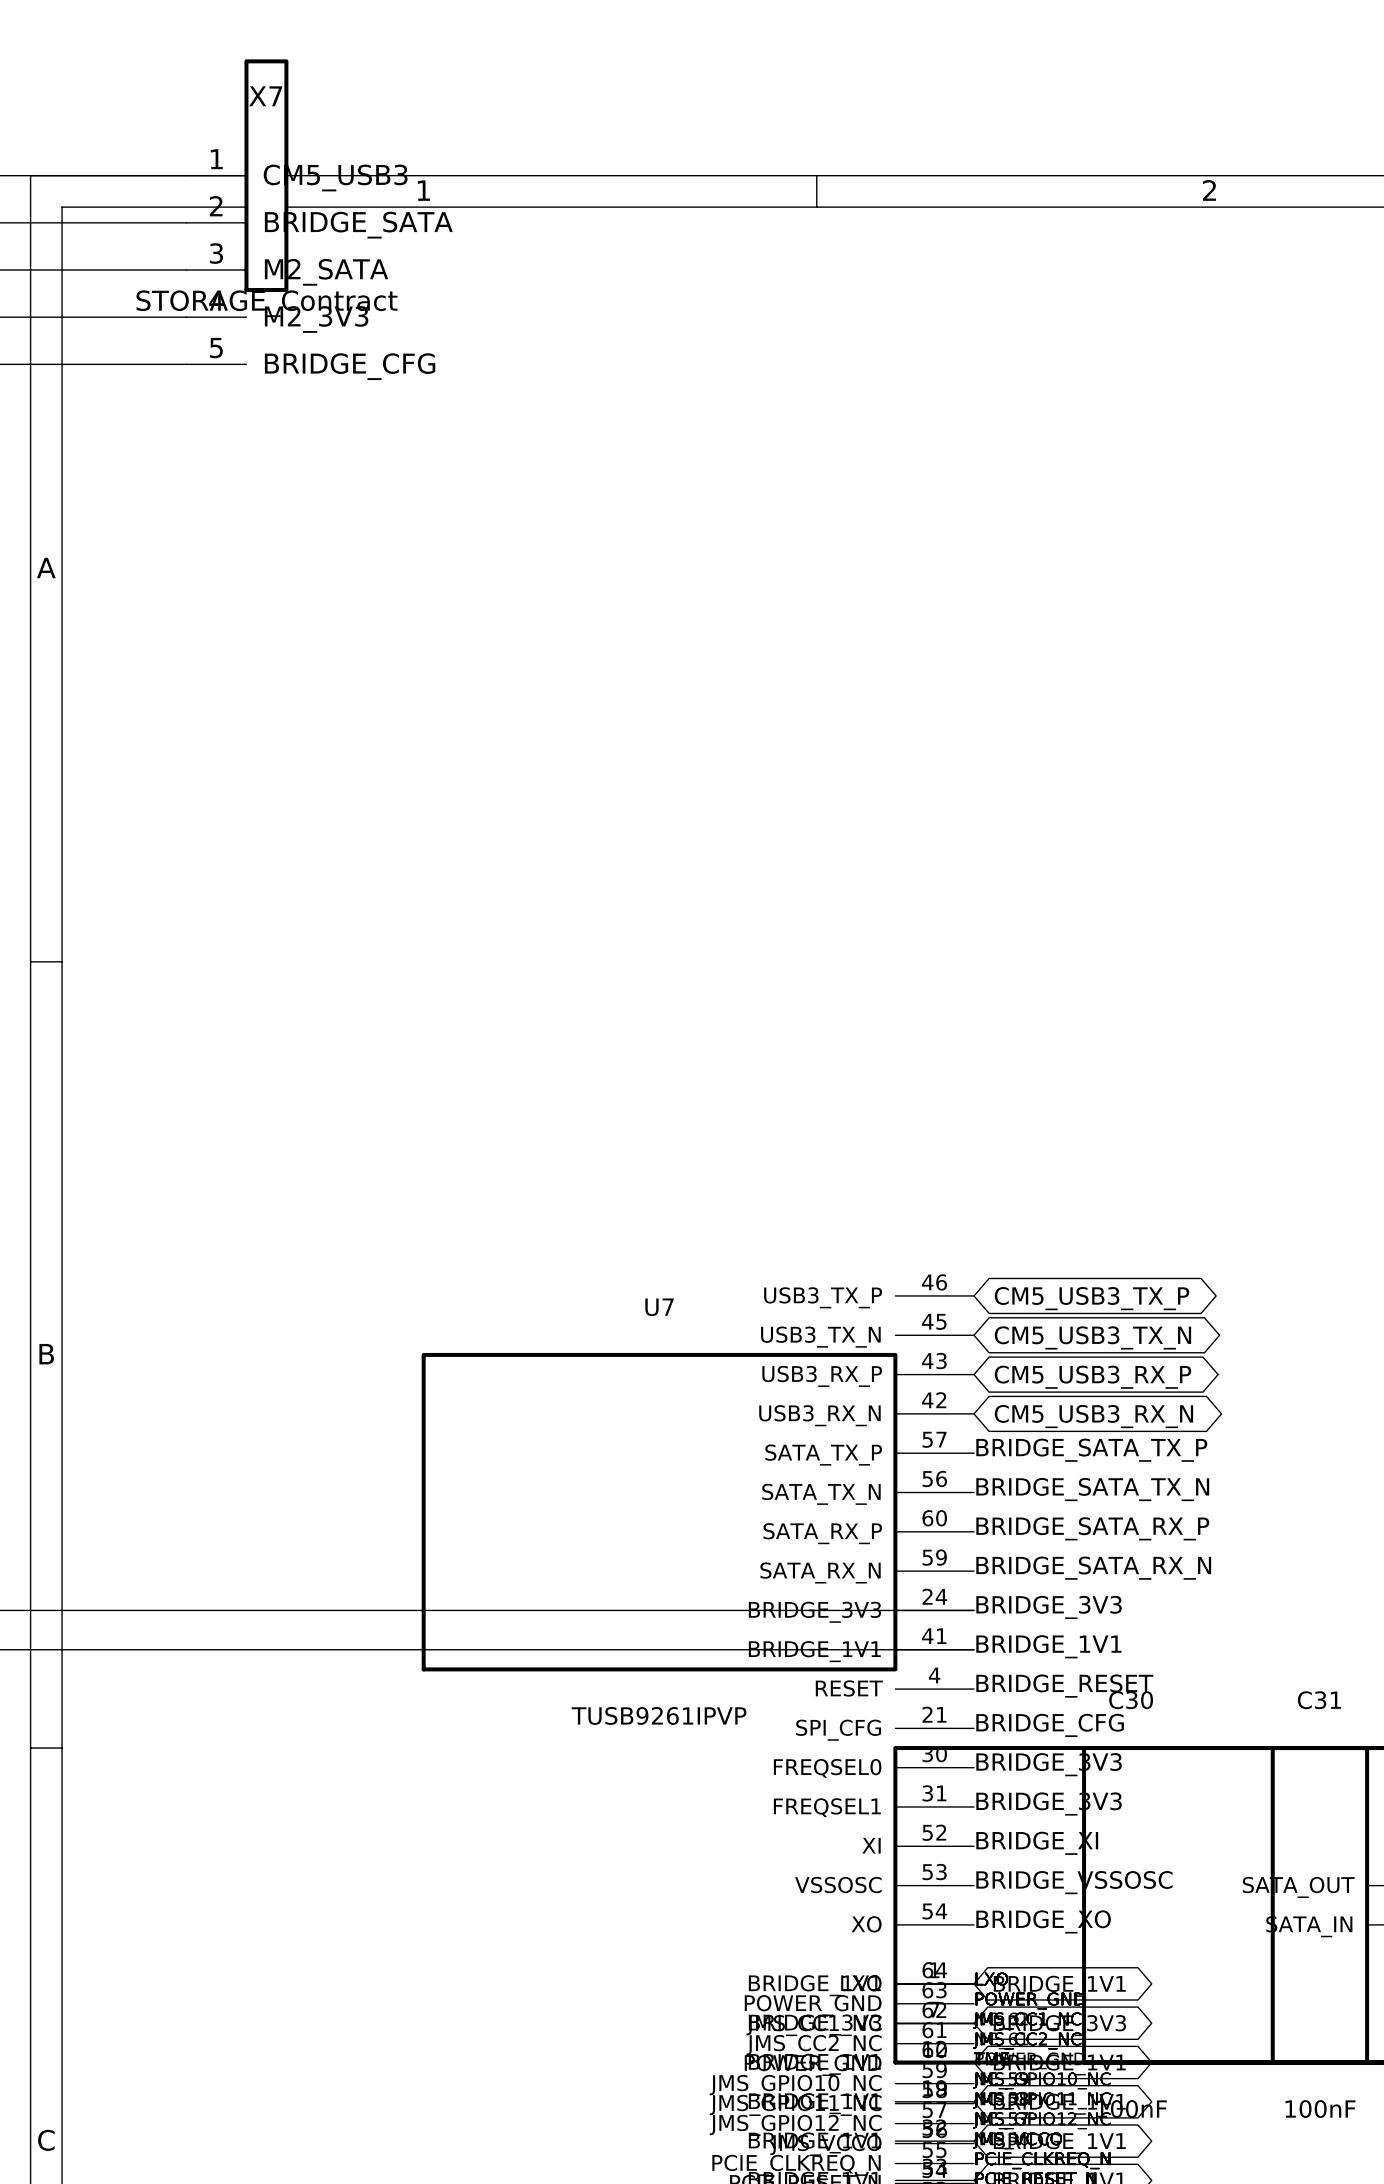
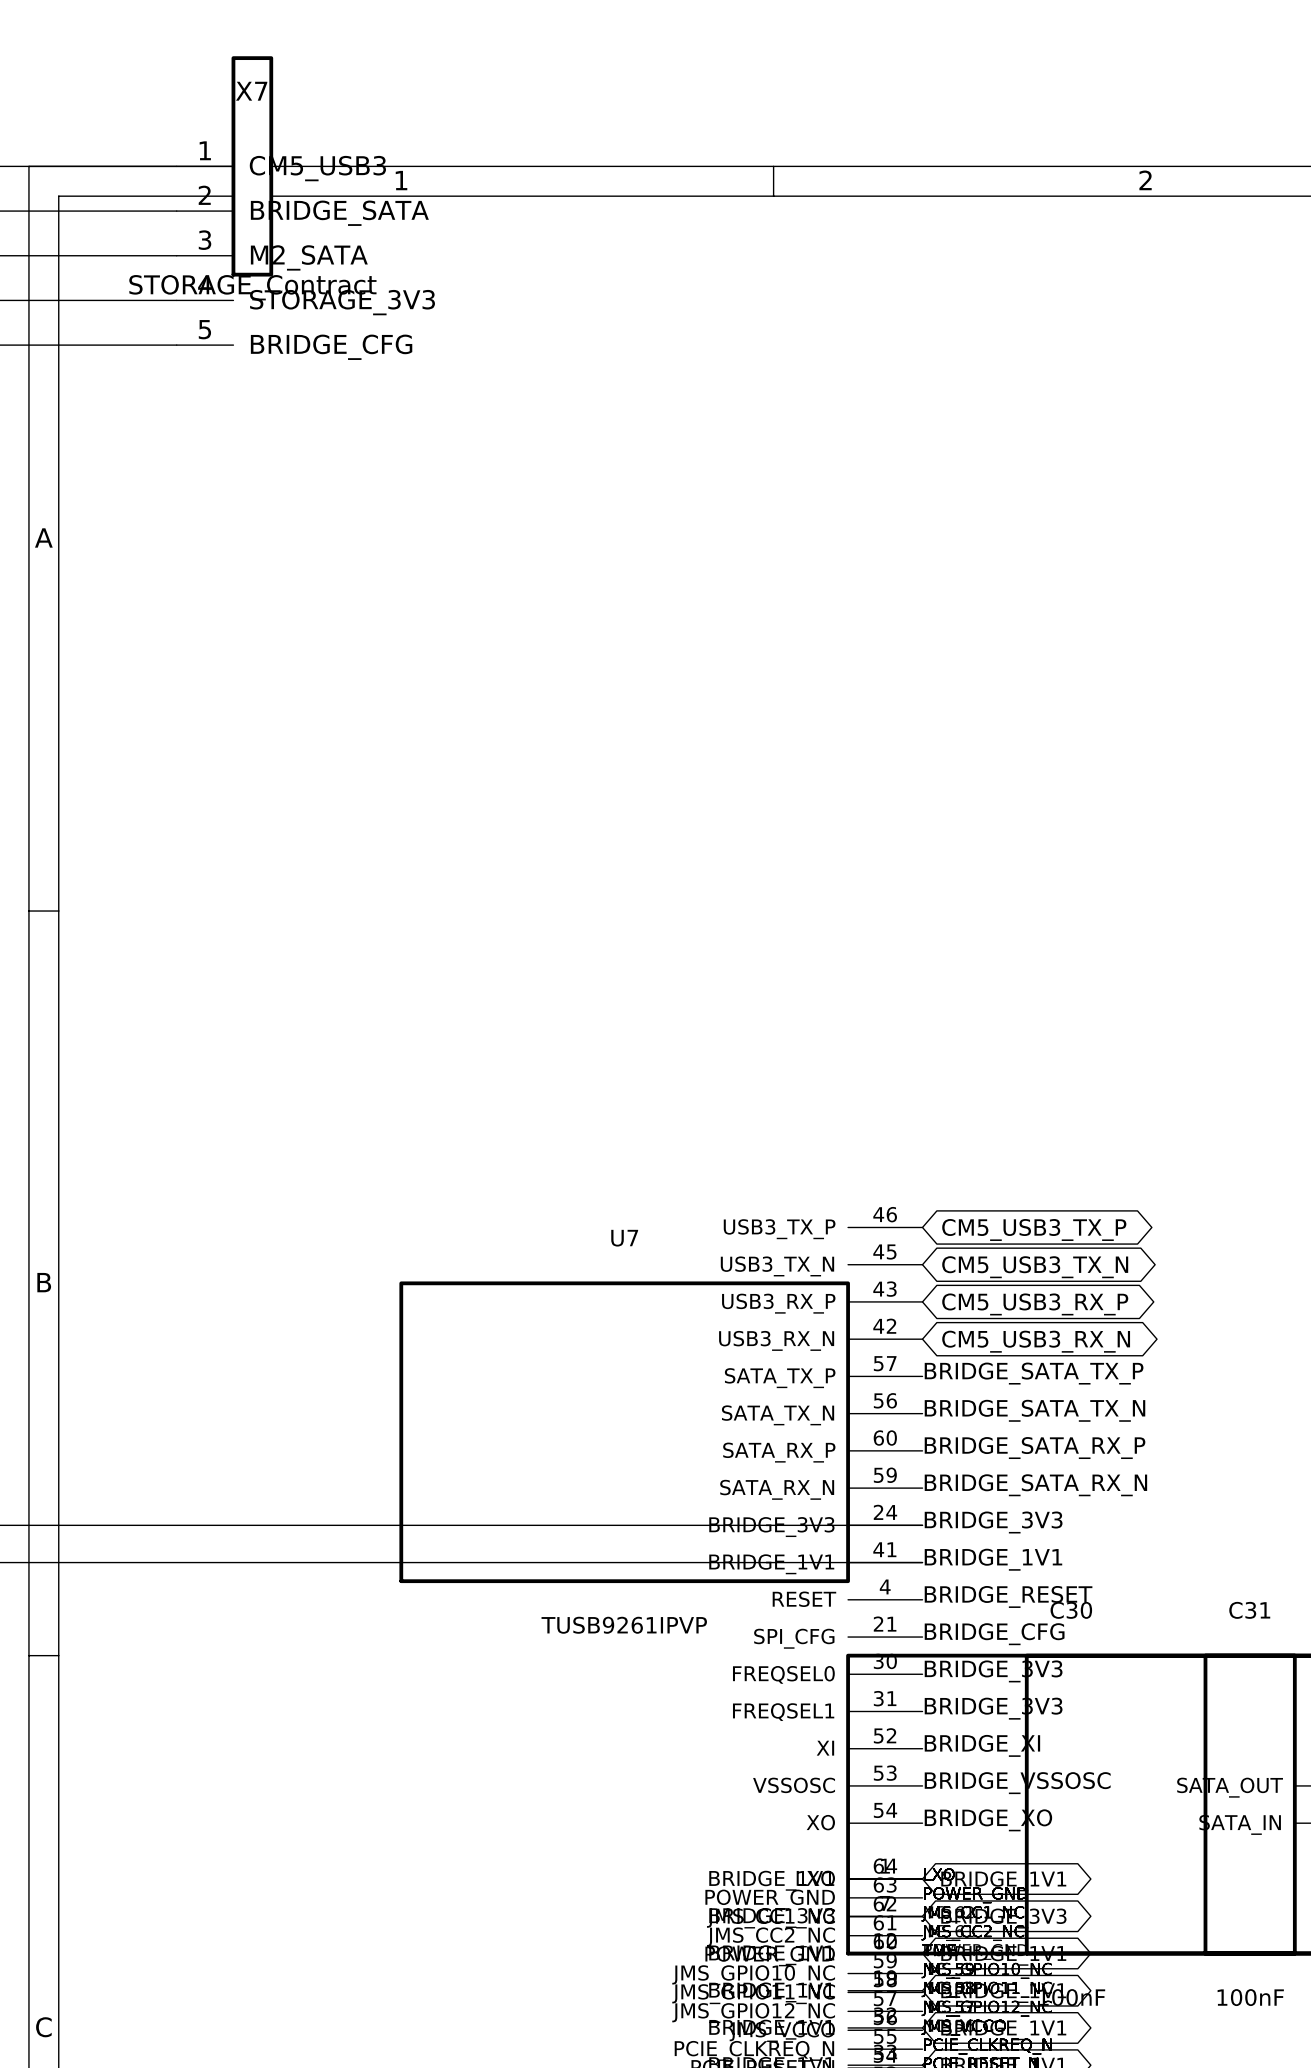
X7 pin name: M2_3V3 (316, 319) -> STORAGE_3V3 (342, 302)

